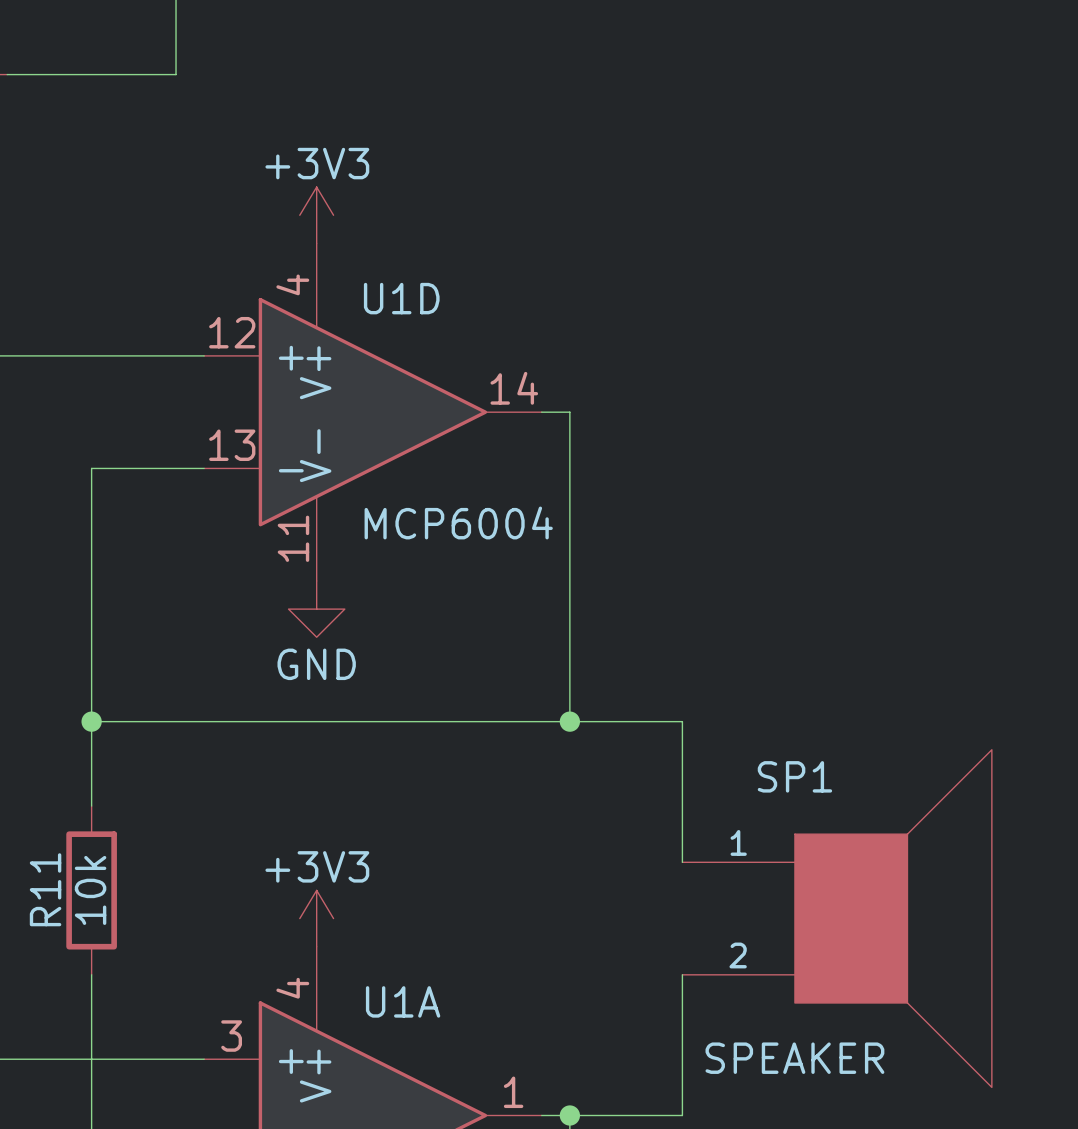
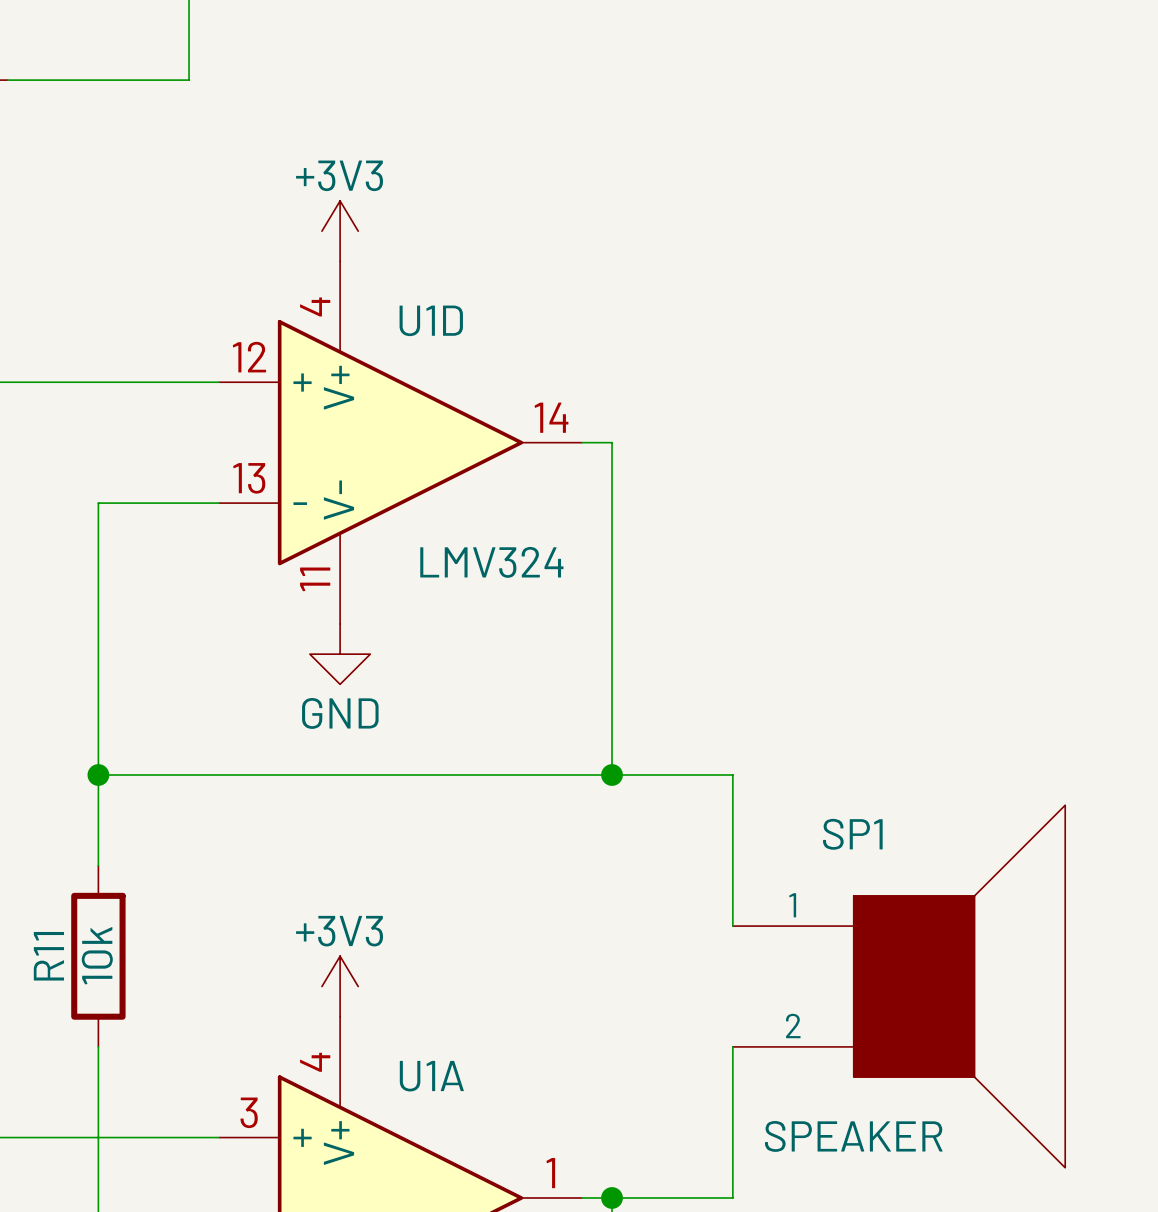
U1D value: MCP6004 (458, 522) -> LMV324 (491, 562)

